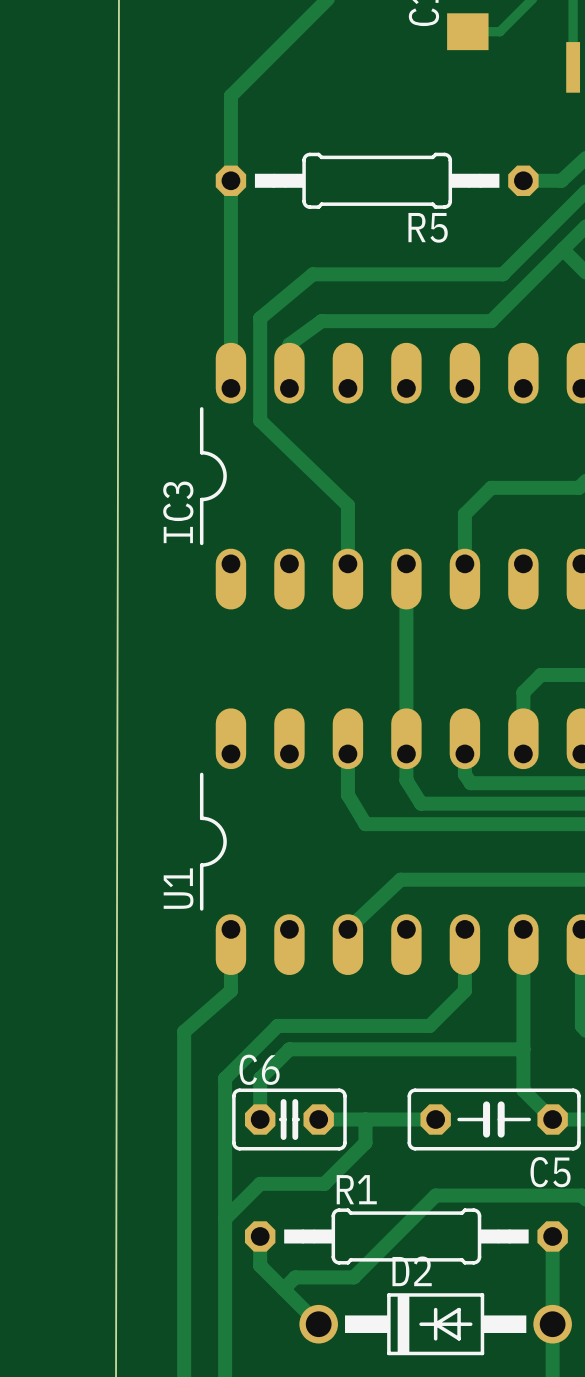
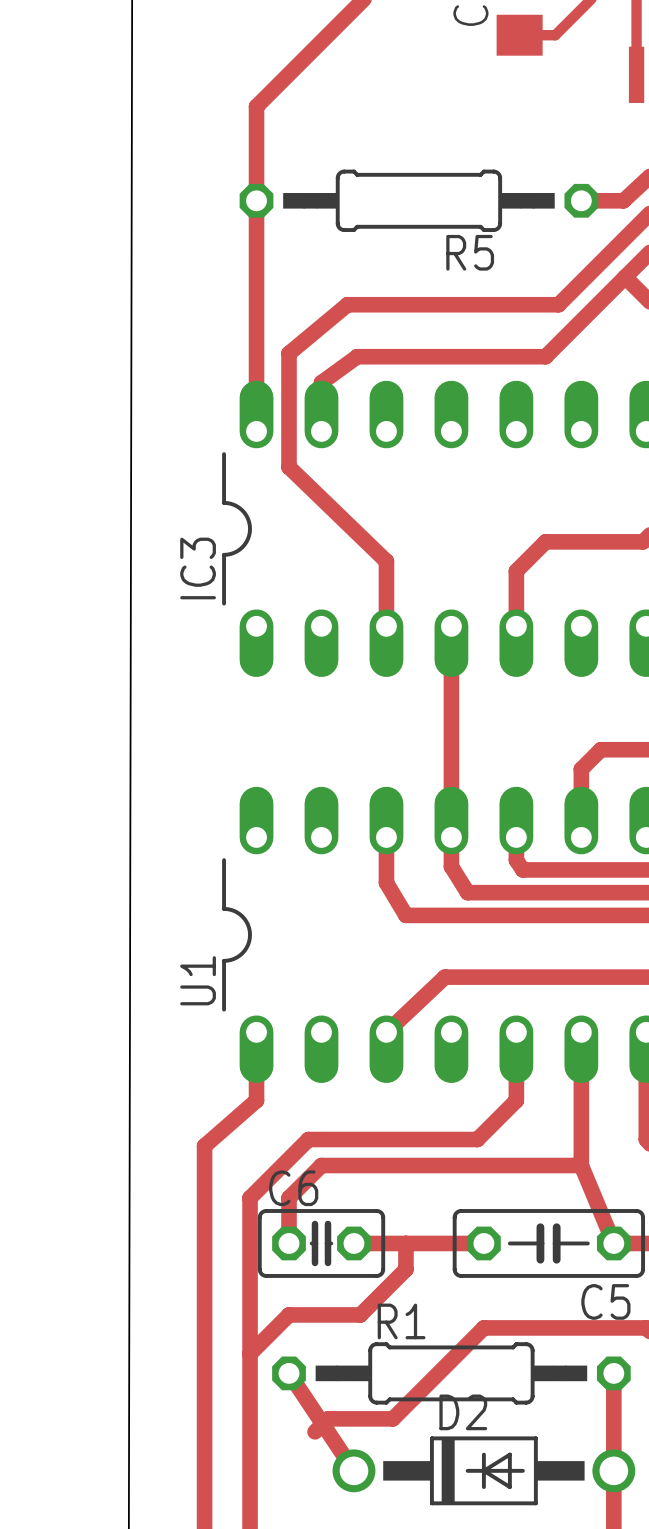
track: (523, 1049) (523, 1090) (552, 1119) -> (581, 1165) (613, 1243)
track: (260, 1236) (260, 1265) (318, 1324) -> (289, 1373) (353, 1470)

